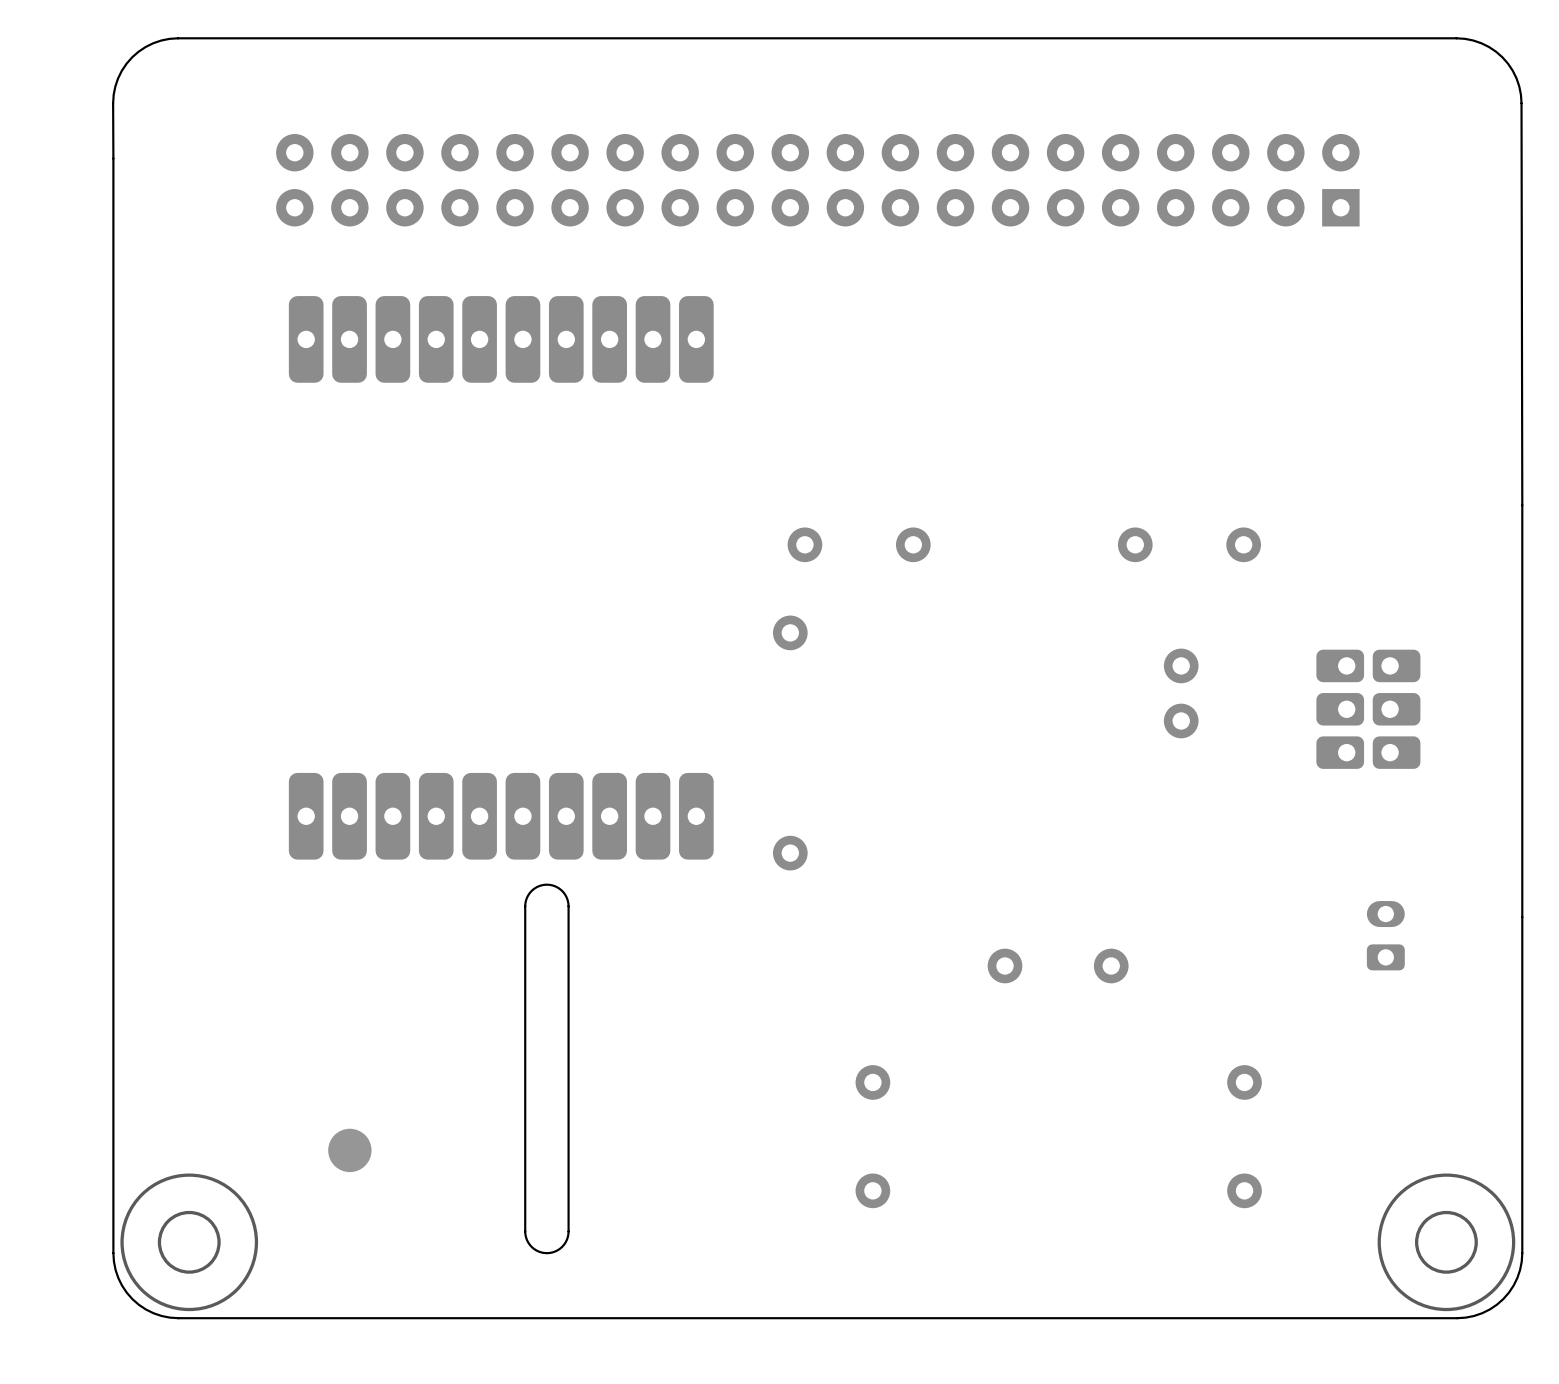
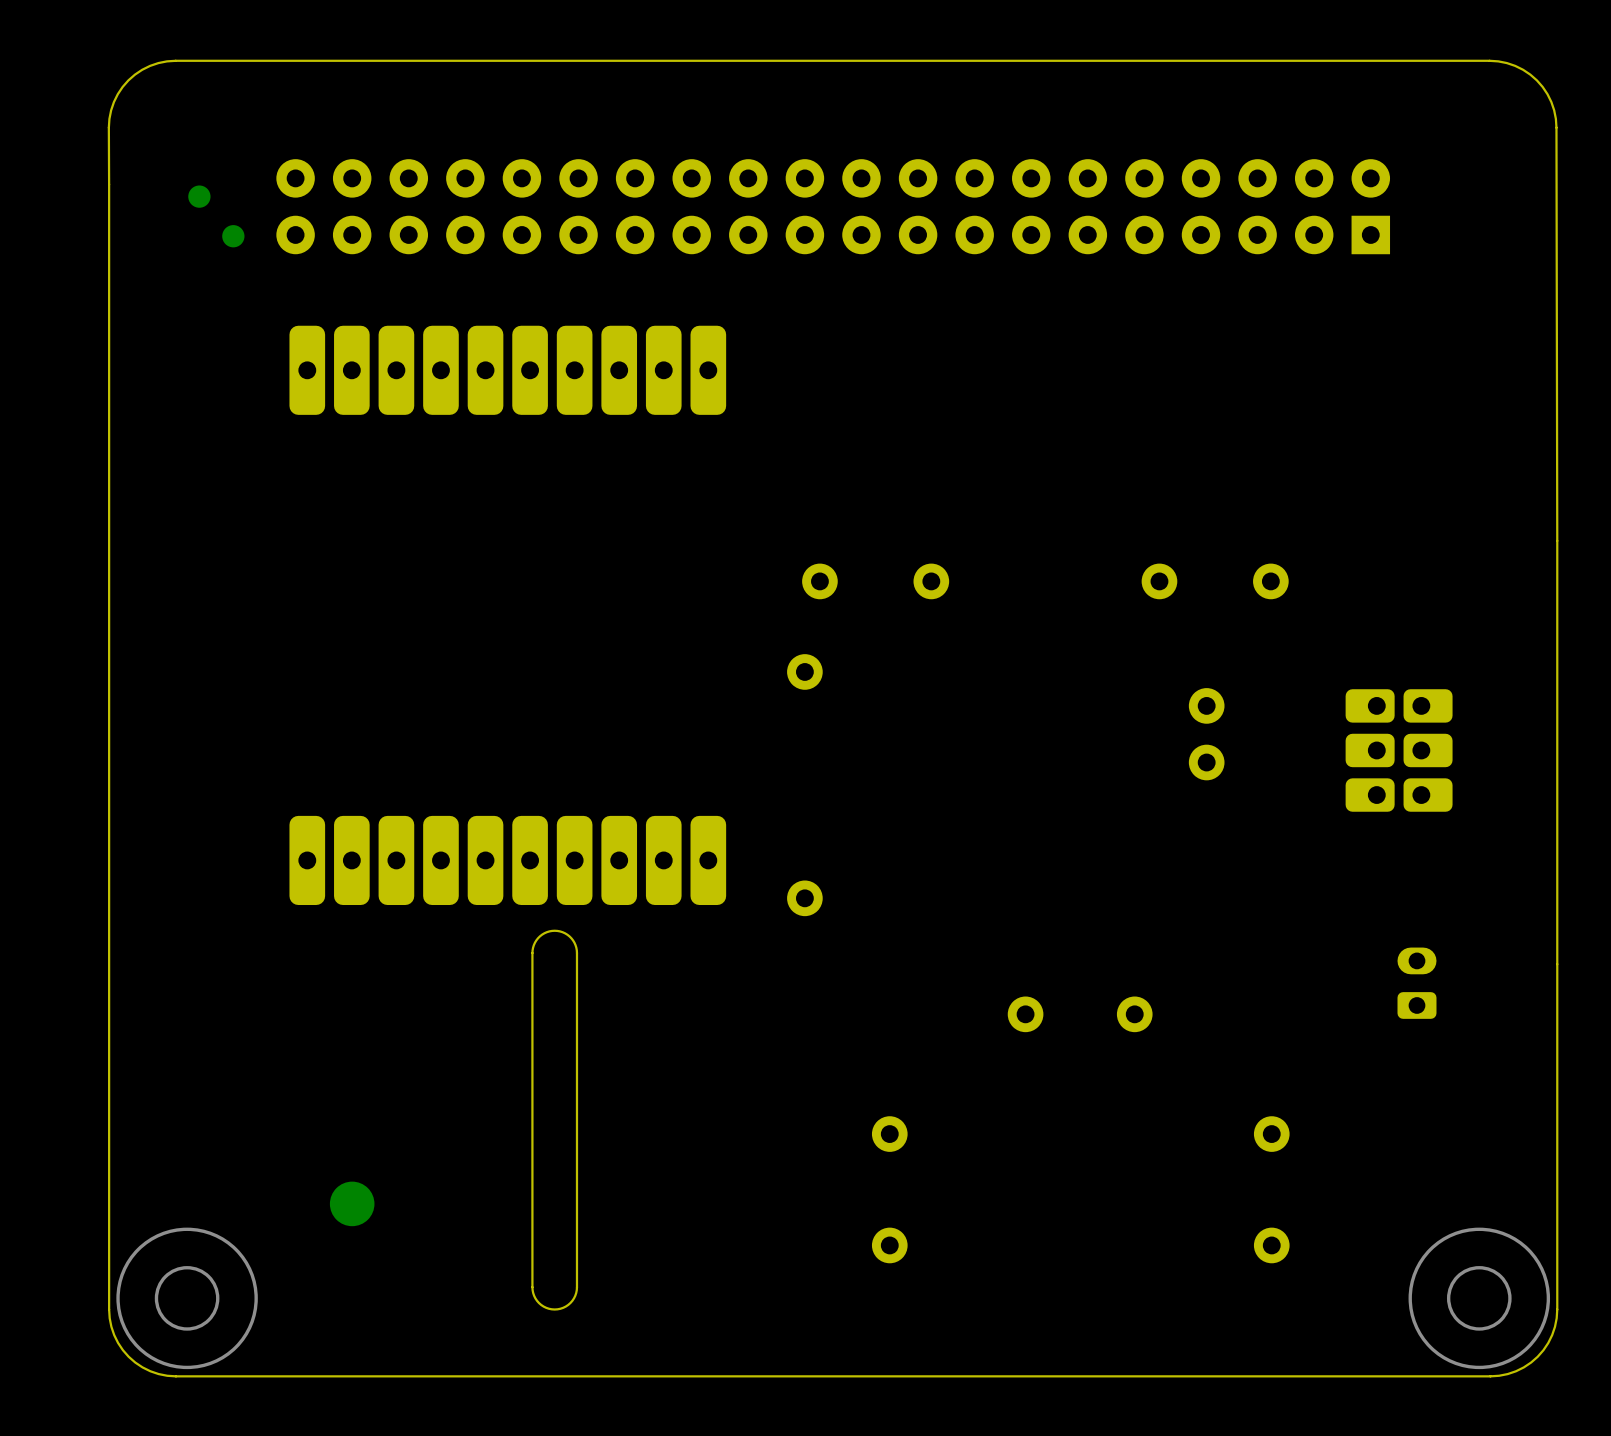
part: none -> (199, 196)
part: none -> (233, 236)

